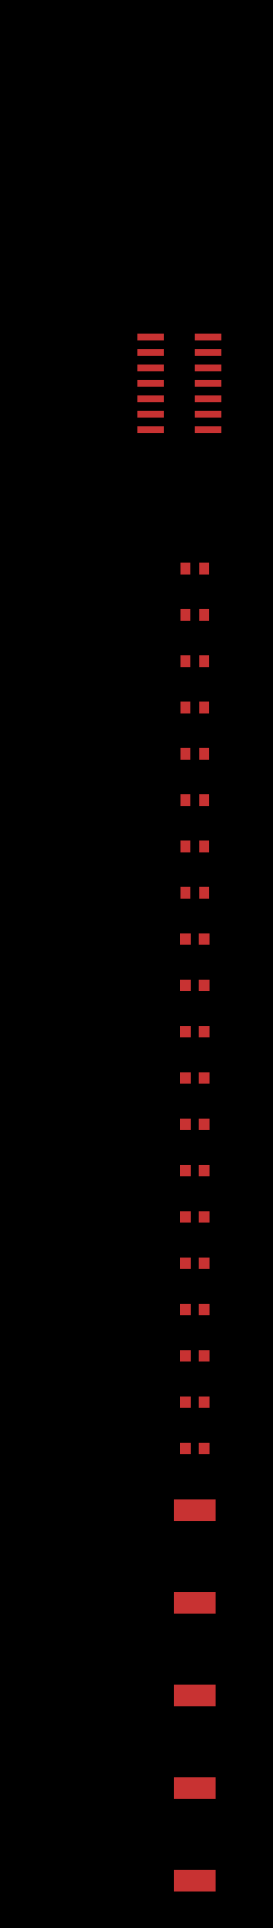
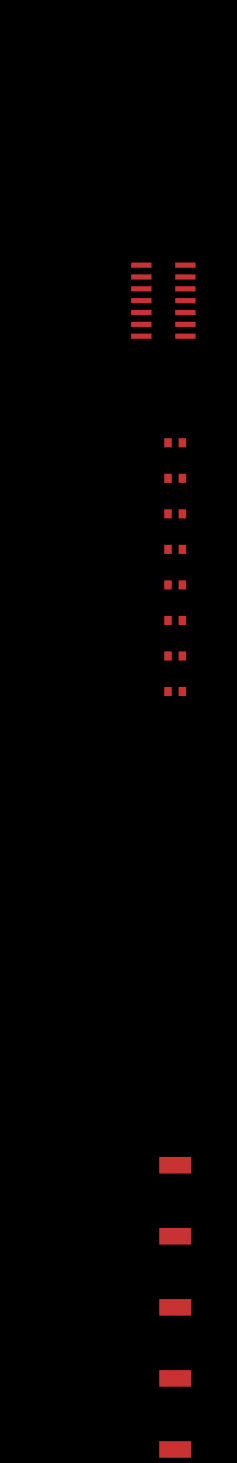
part: (194, 939) -> none
part: (194, 985) -> none
part: (194, 1031) -> none
part: (194, 1077) -> none
part: (194, 1124) -> none
part: (194, 1170) -> none
part: (194, 1216) -> none
part: (194, 1263) -> none
part: (194, 1309) -> none
part: (194, 1355) -> none
part: (194, 1402) -> none
part: (194, 1448) -> none

